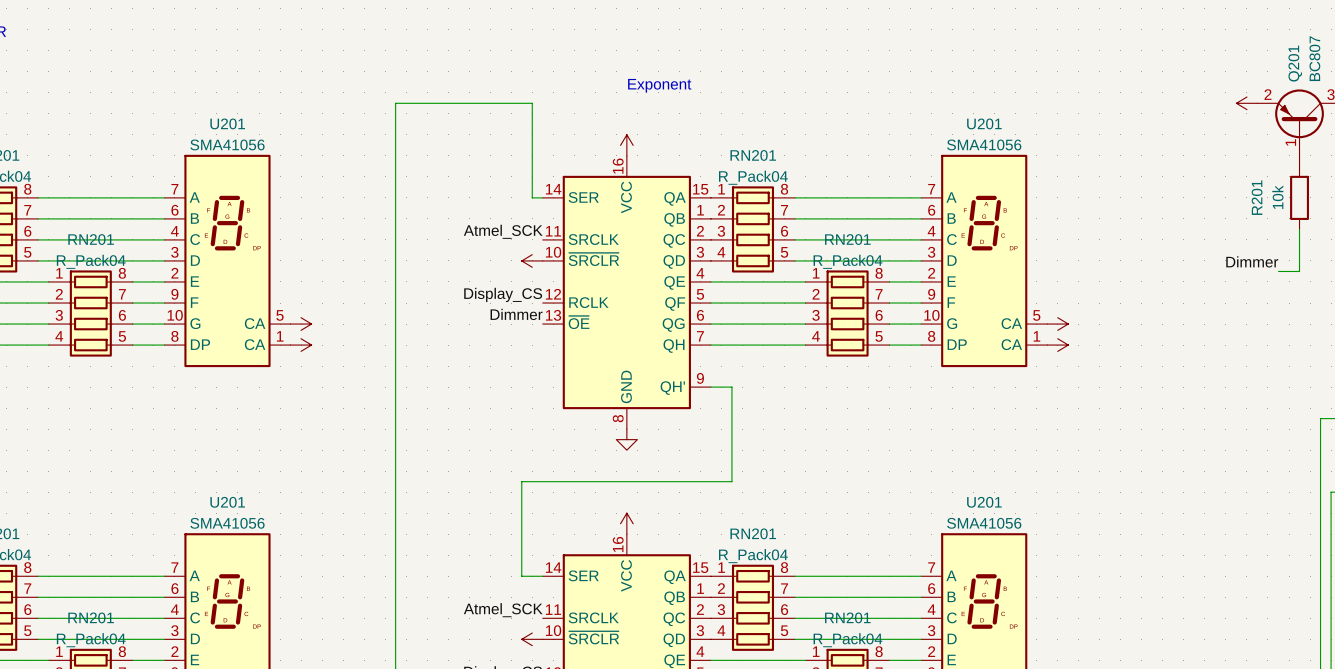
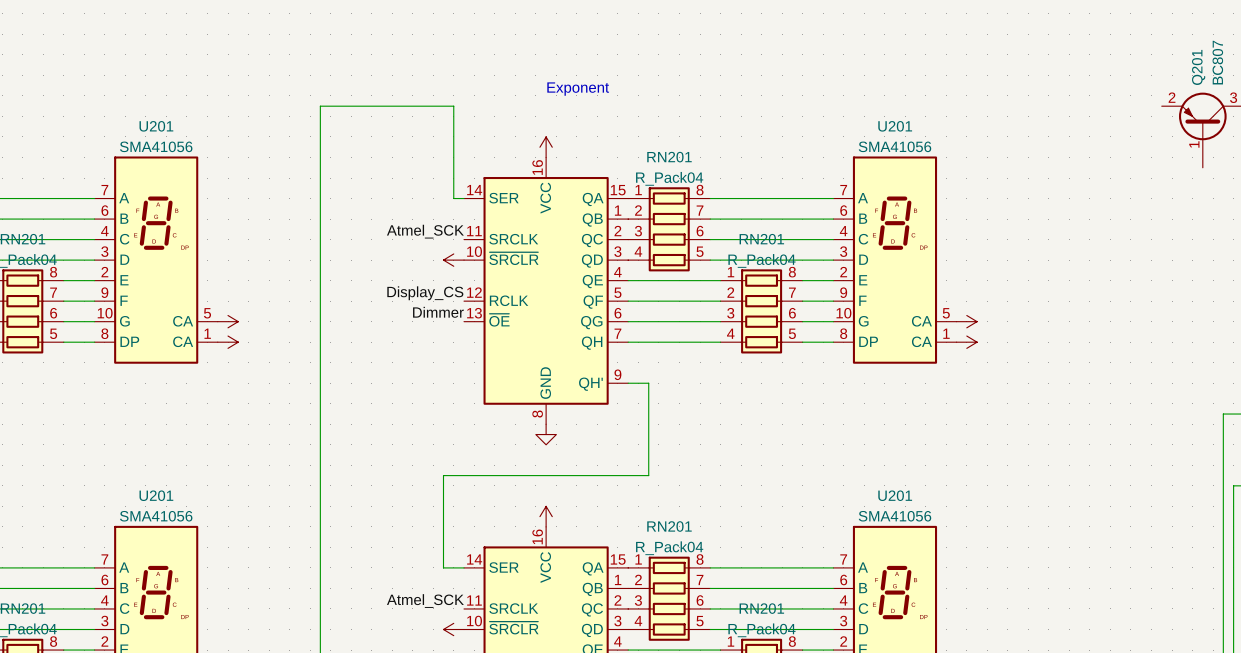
power symbol: (1246, 103) -> none
R201: 10k (1299, 197) -> none
wire: (1299, 229) (1299, 271) (1278, 271) -> none
label: Dimmer (1252, 261) -> none

